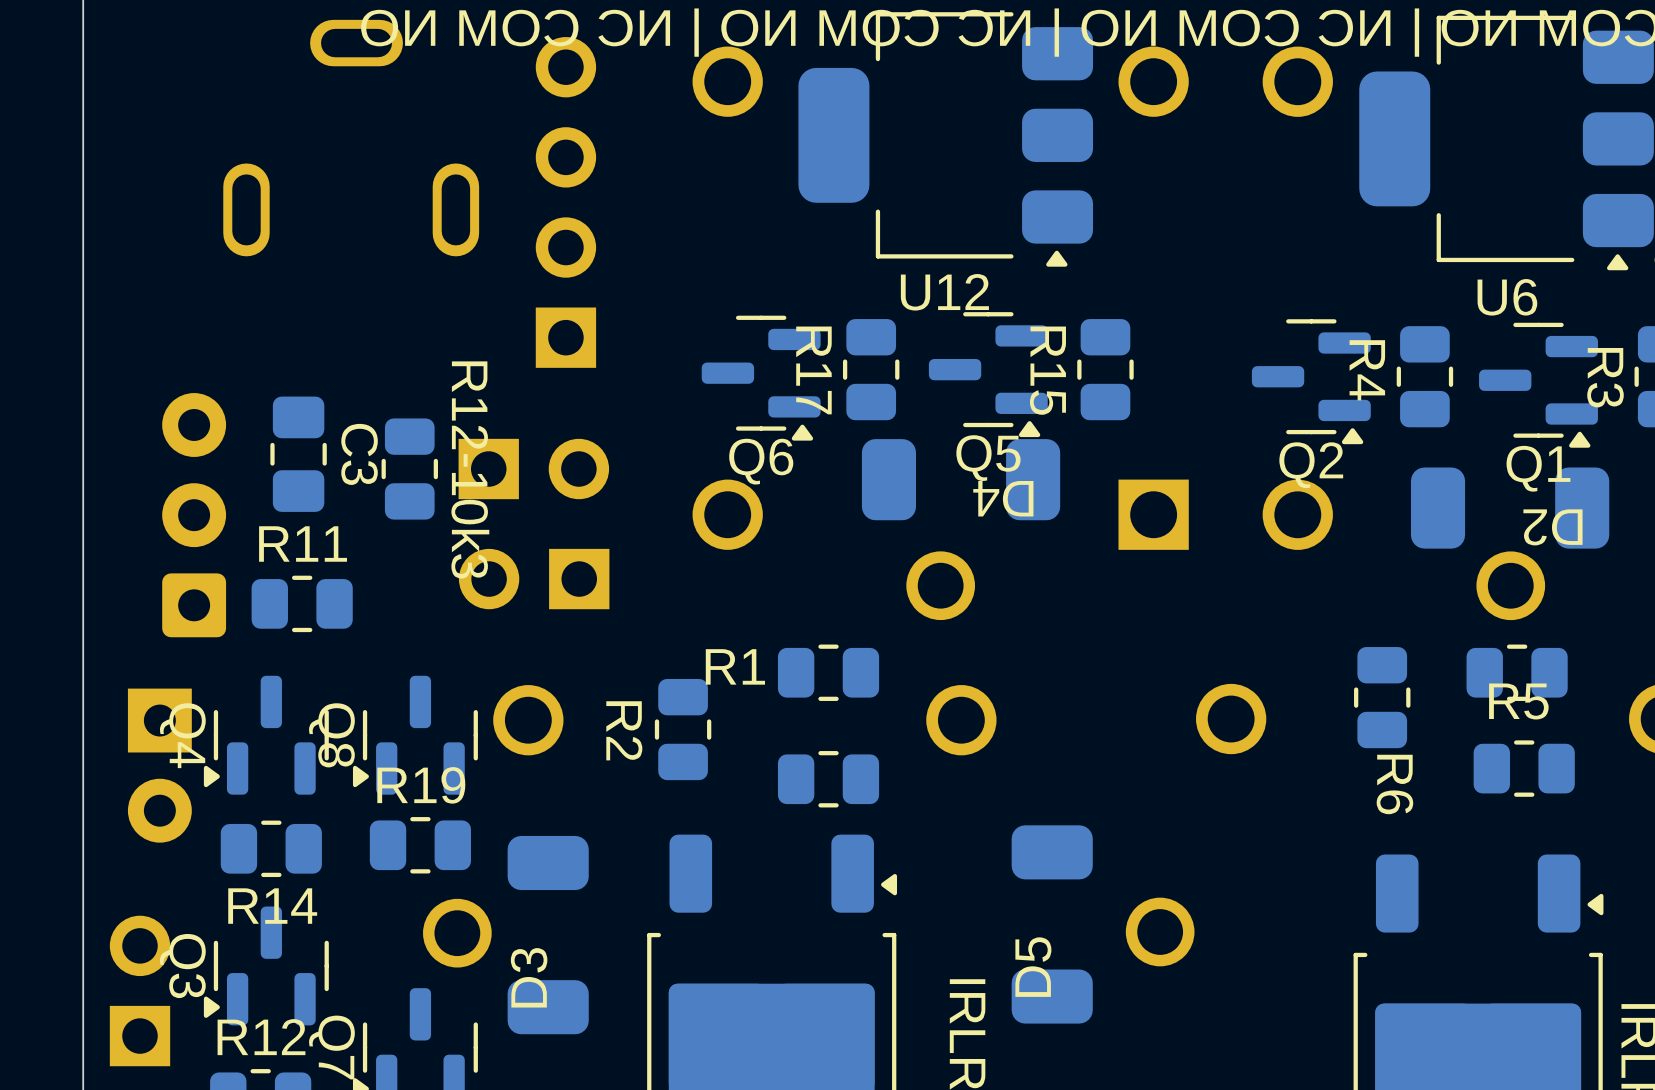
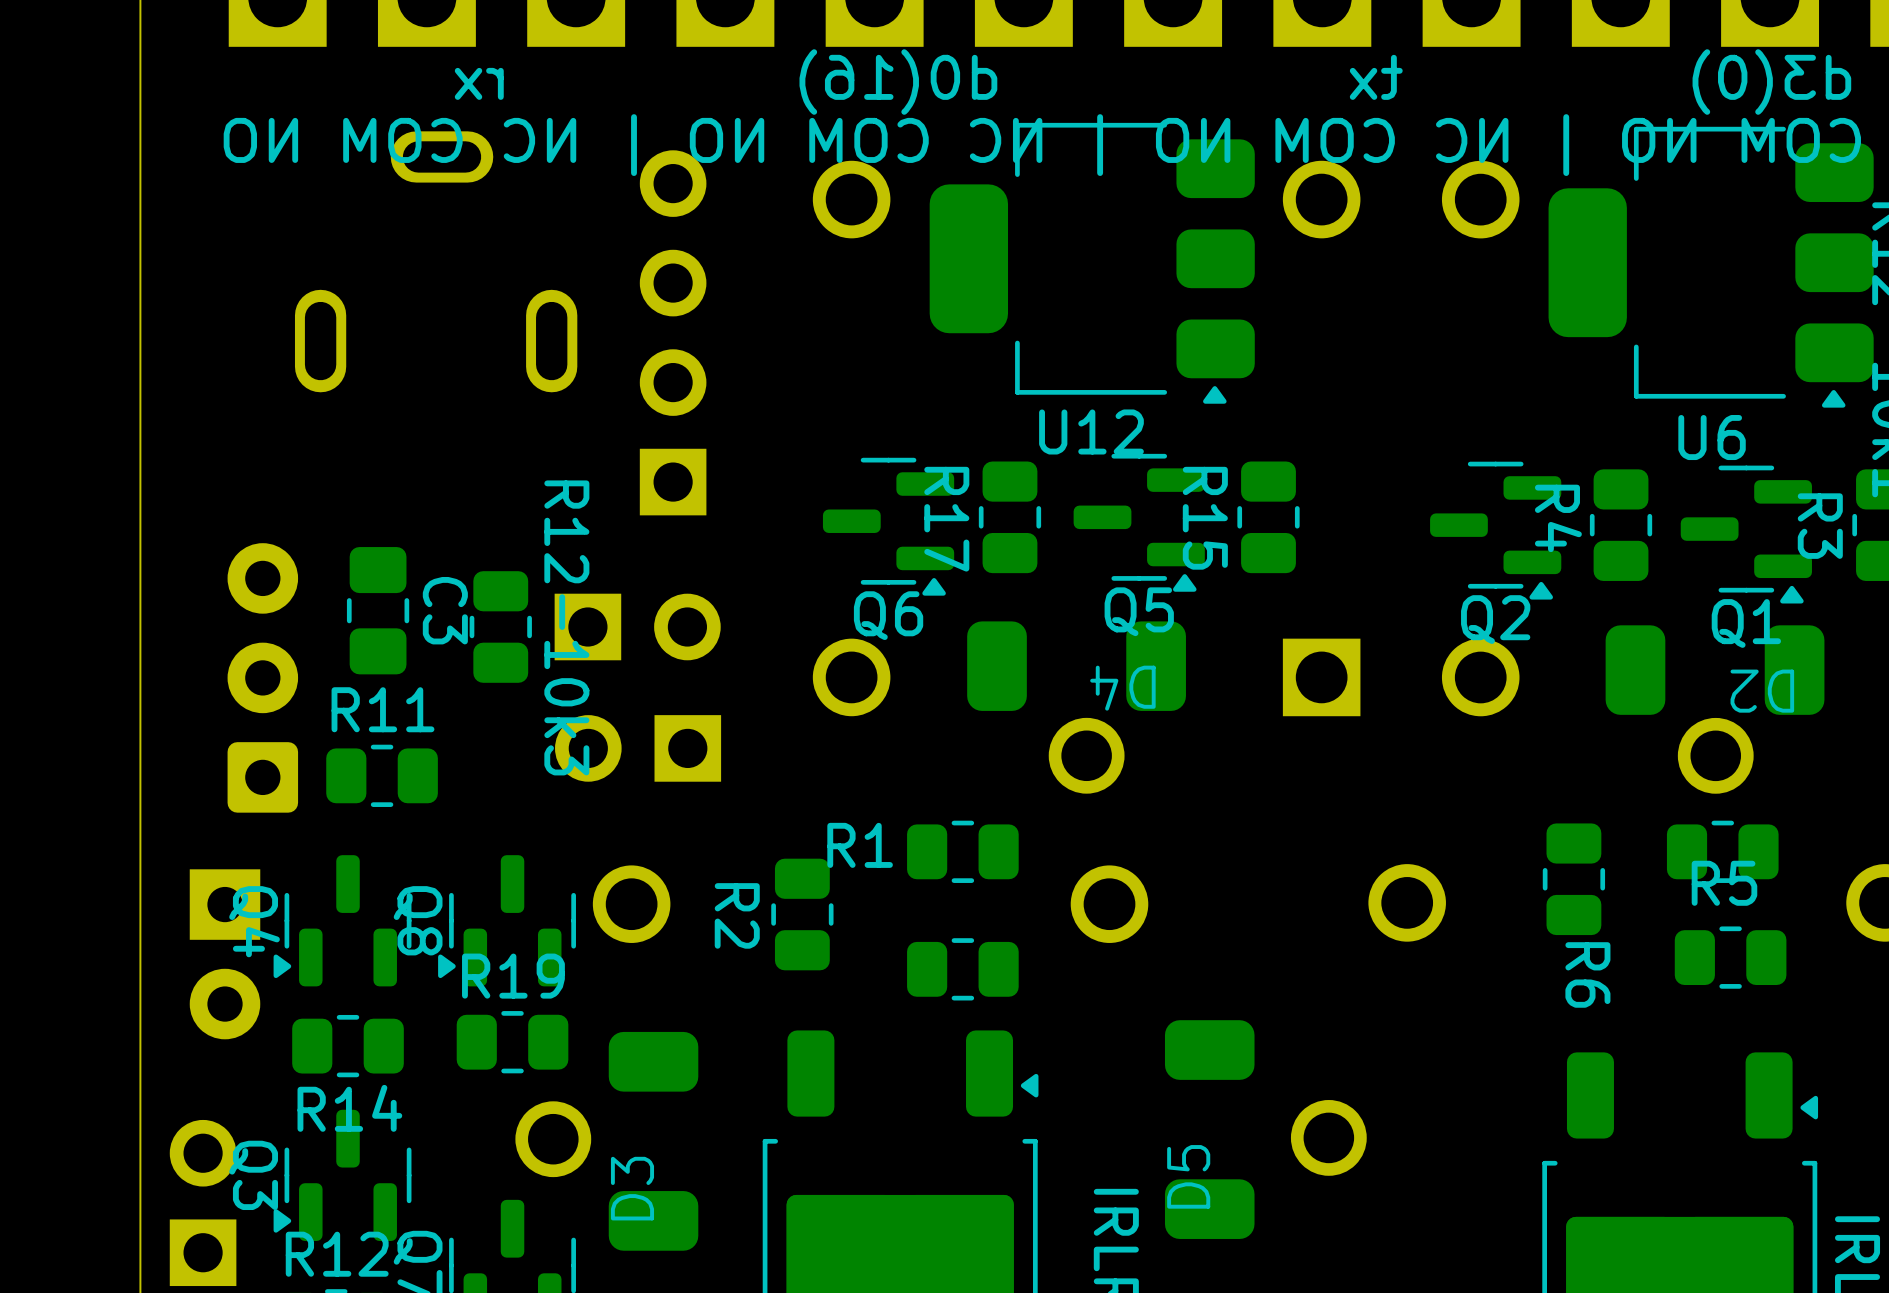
D4 position: (961, 479) -> (1076, 666)

